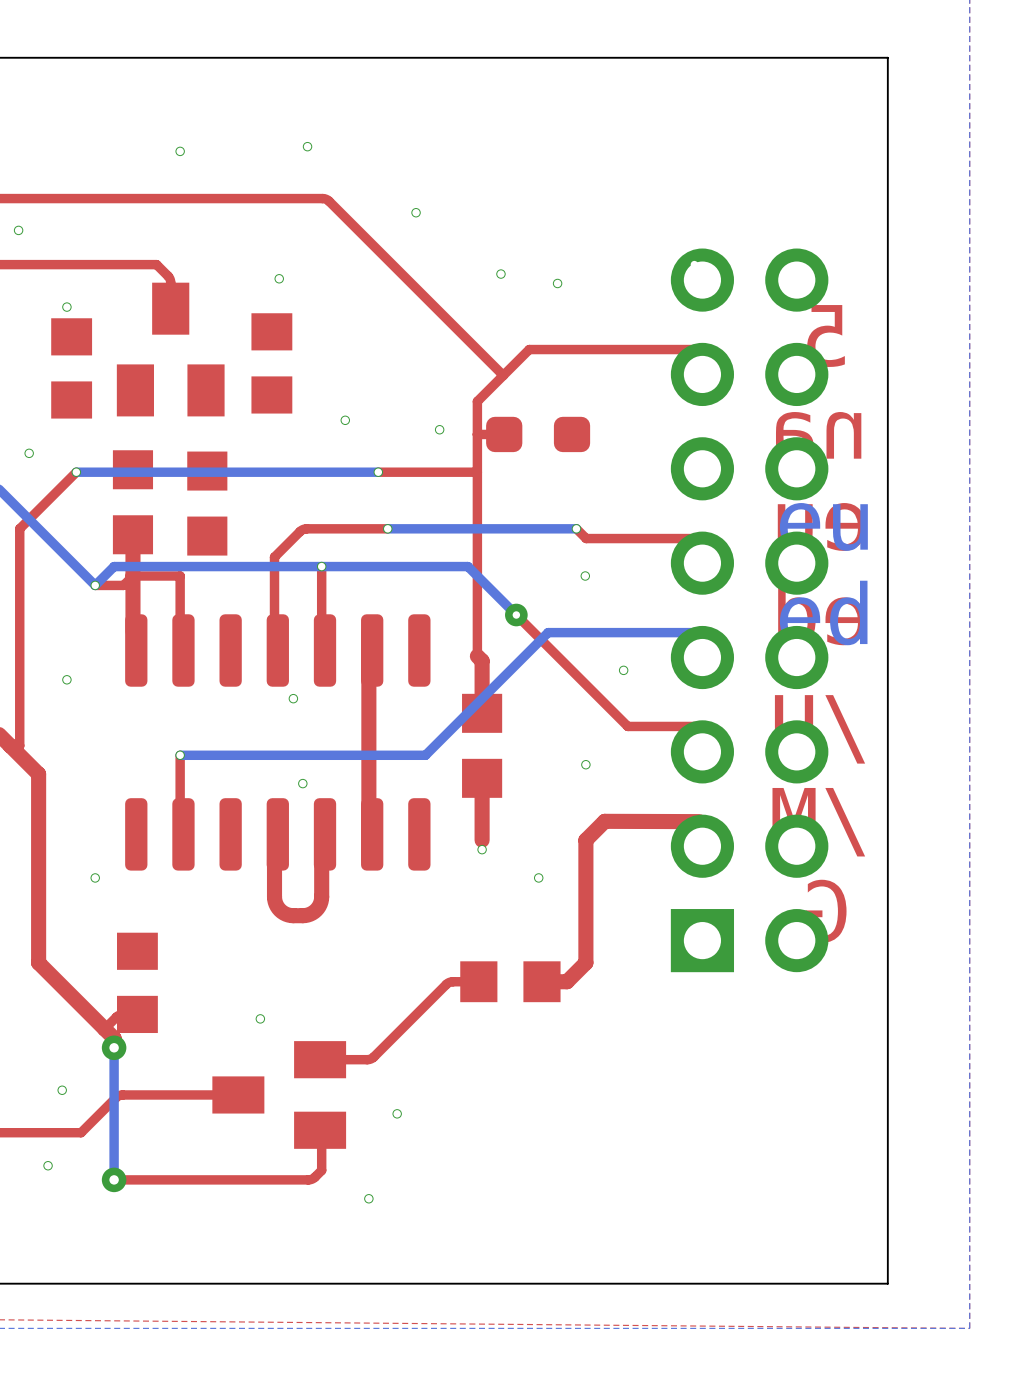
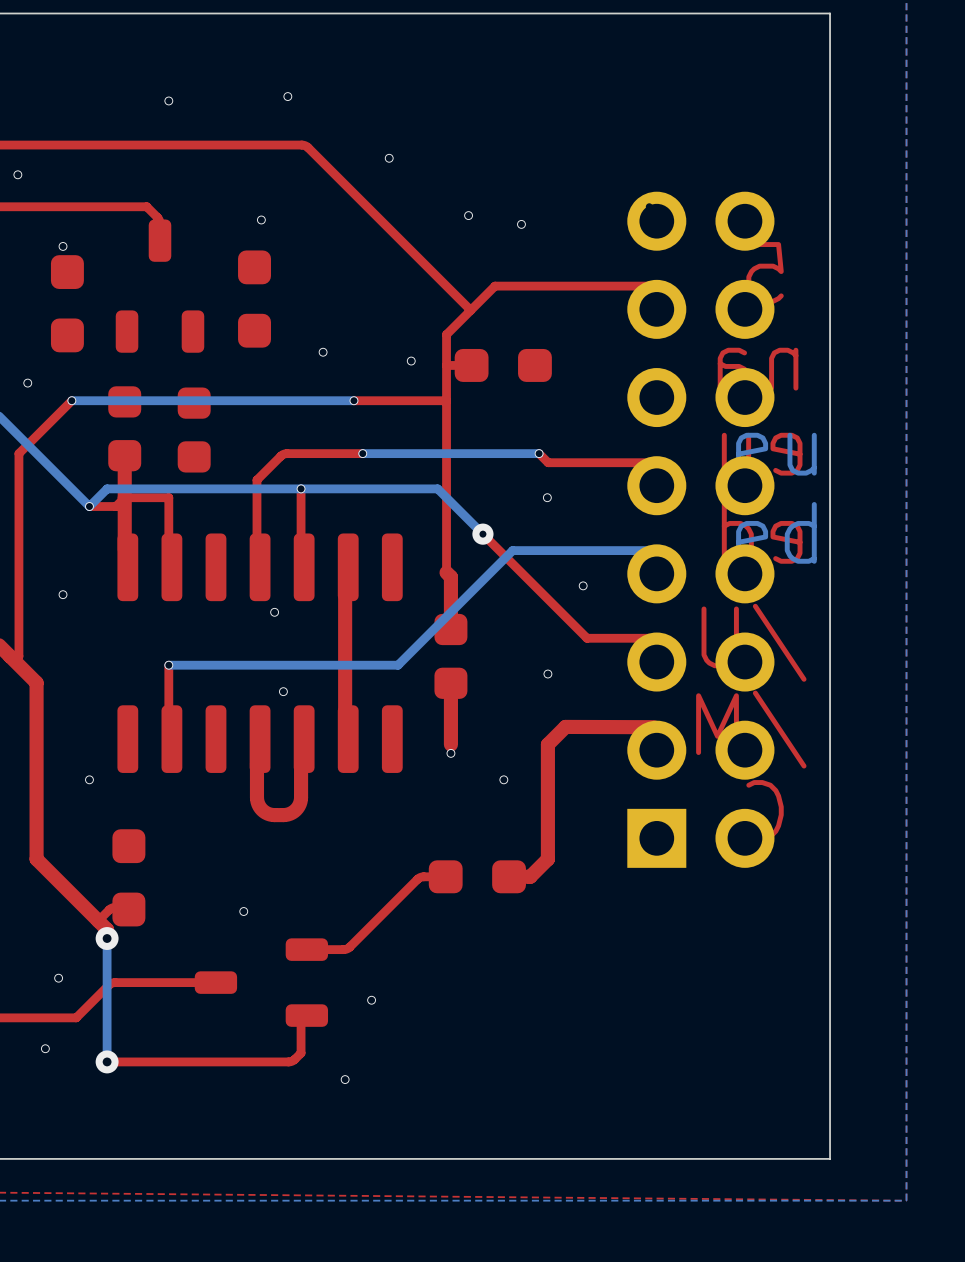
part footprint: [116, 282, 225, 417] -> [115, 219, 205, 353]
part footprint: [251, 313, 293, 414] -> [238, 250, 272, 348]
part footprint: [51, 318, 93, 419] -> [50, 255, 84, 353]
part footprint: [112, 450, 154, 555] -> [108, 386, 142, 472]
part footprint: [187, 451, 228, 556] -> [177, 387, 211, 473]
part footprint: [462, 693, 503, 798] -> [434, 613, 468, 699]
part footprint: [117, 932, 158, 1034] -> [112, 829, 146, 927]
part footprint: [460, 961, 561, 1003] -> [428, 860, 526, 894]
part footprint: [212, 1041, 347, 1149] -> [194, 938, 329, 1027]

